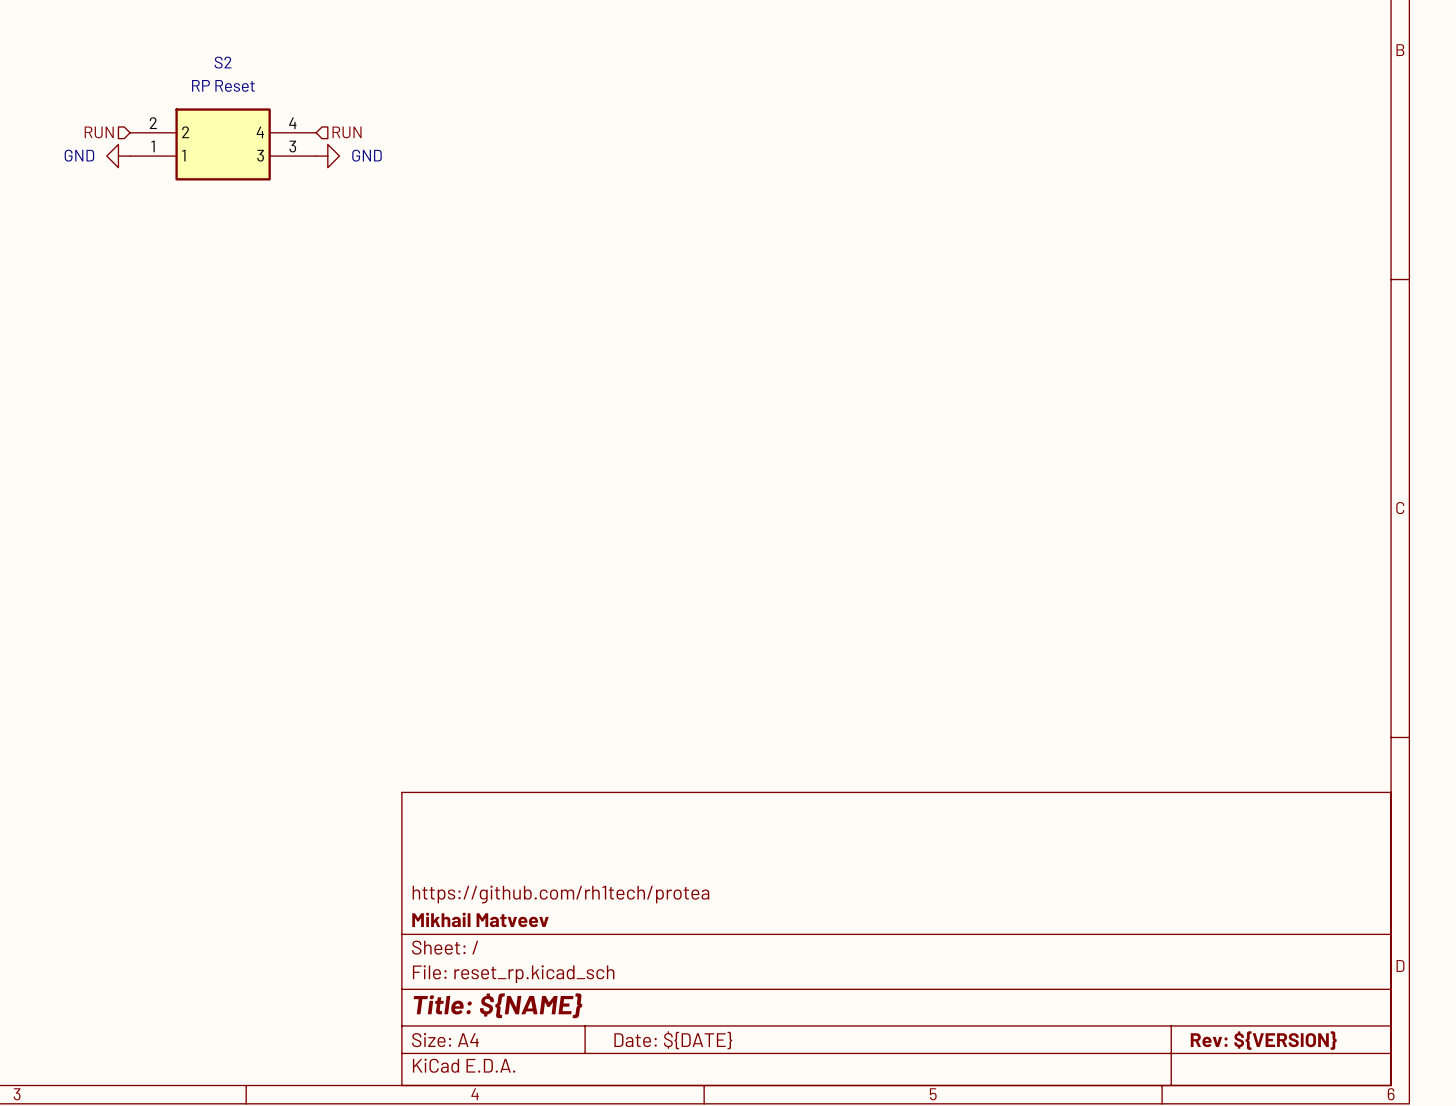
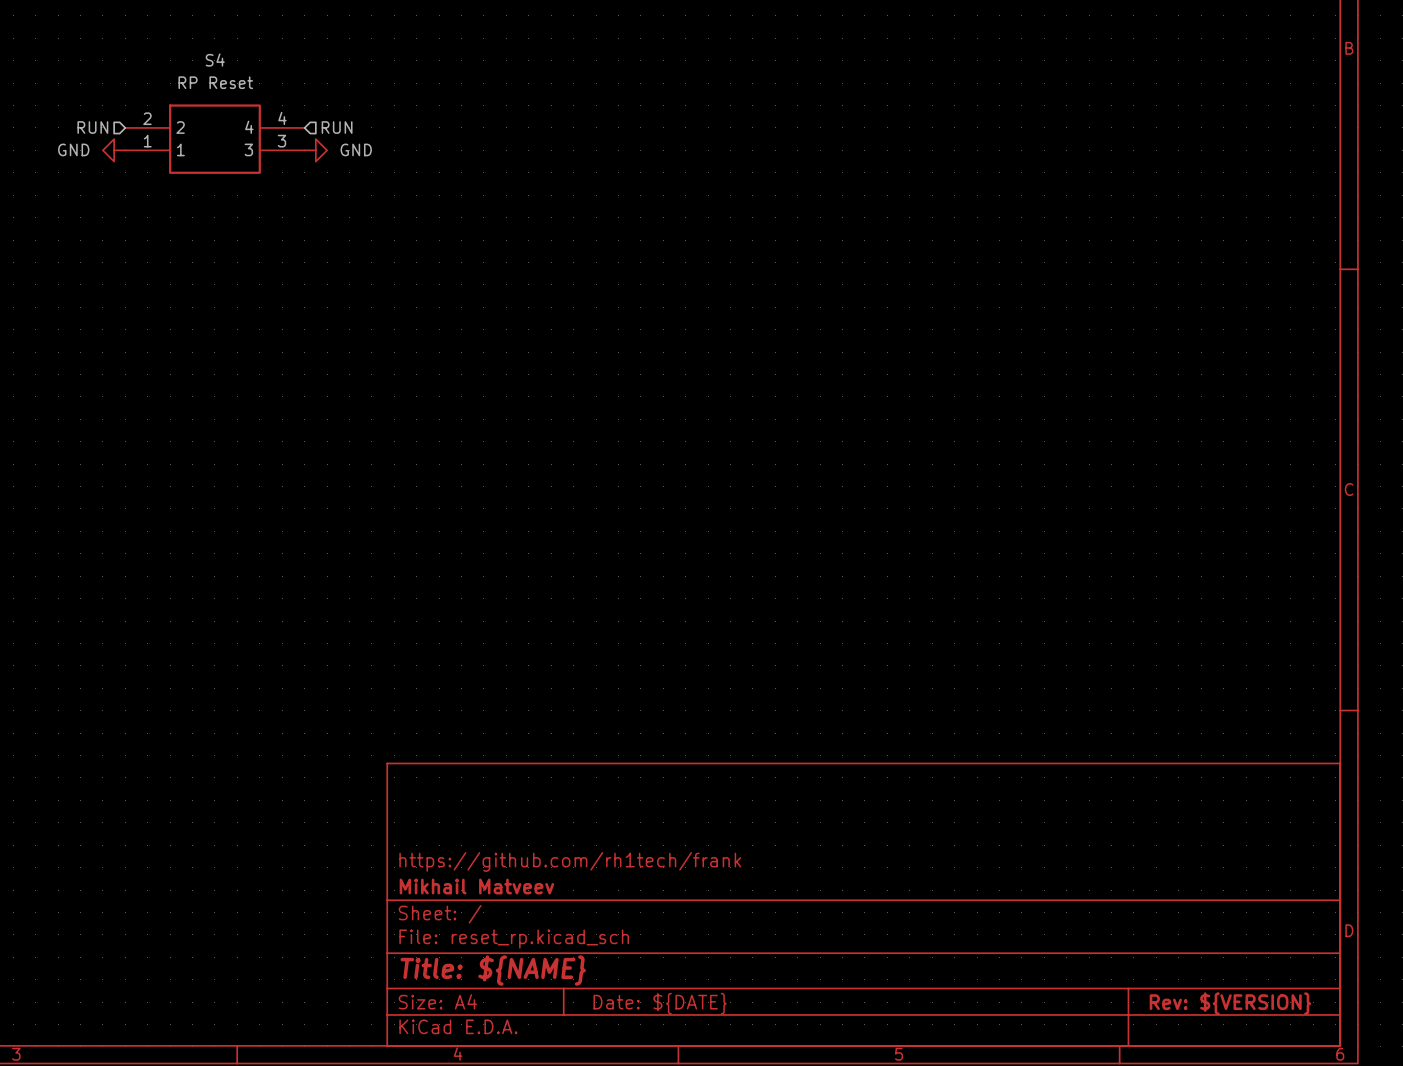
S2 name: S2 (223, 62) -> S4 (215, 60)
title block: https://github.com/rh1tech/protea (560, 894) -> https://github.com/rh1tech/frank (570, 861)

